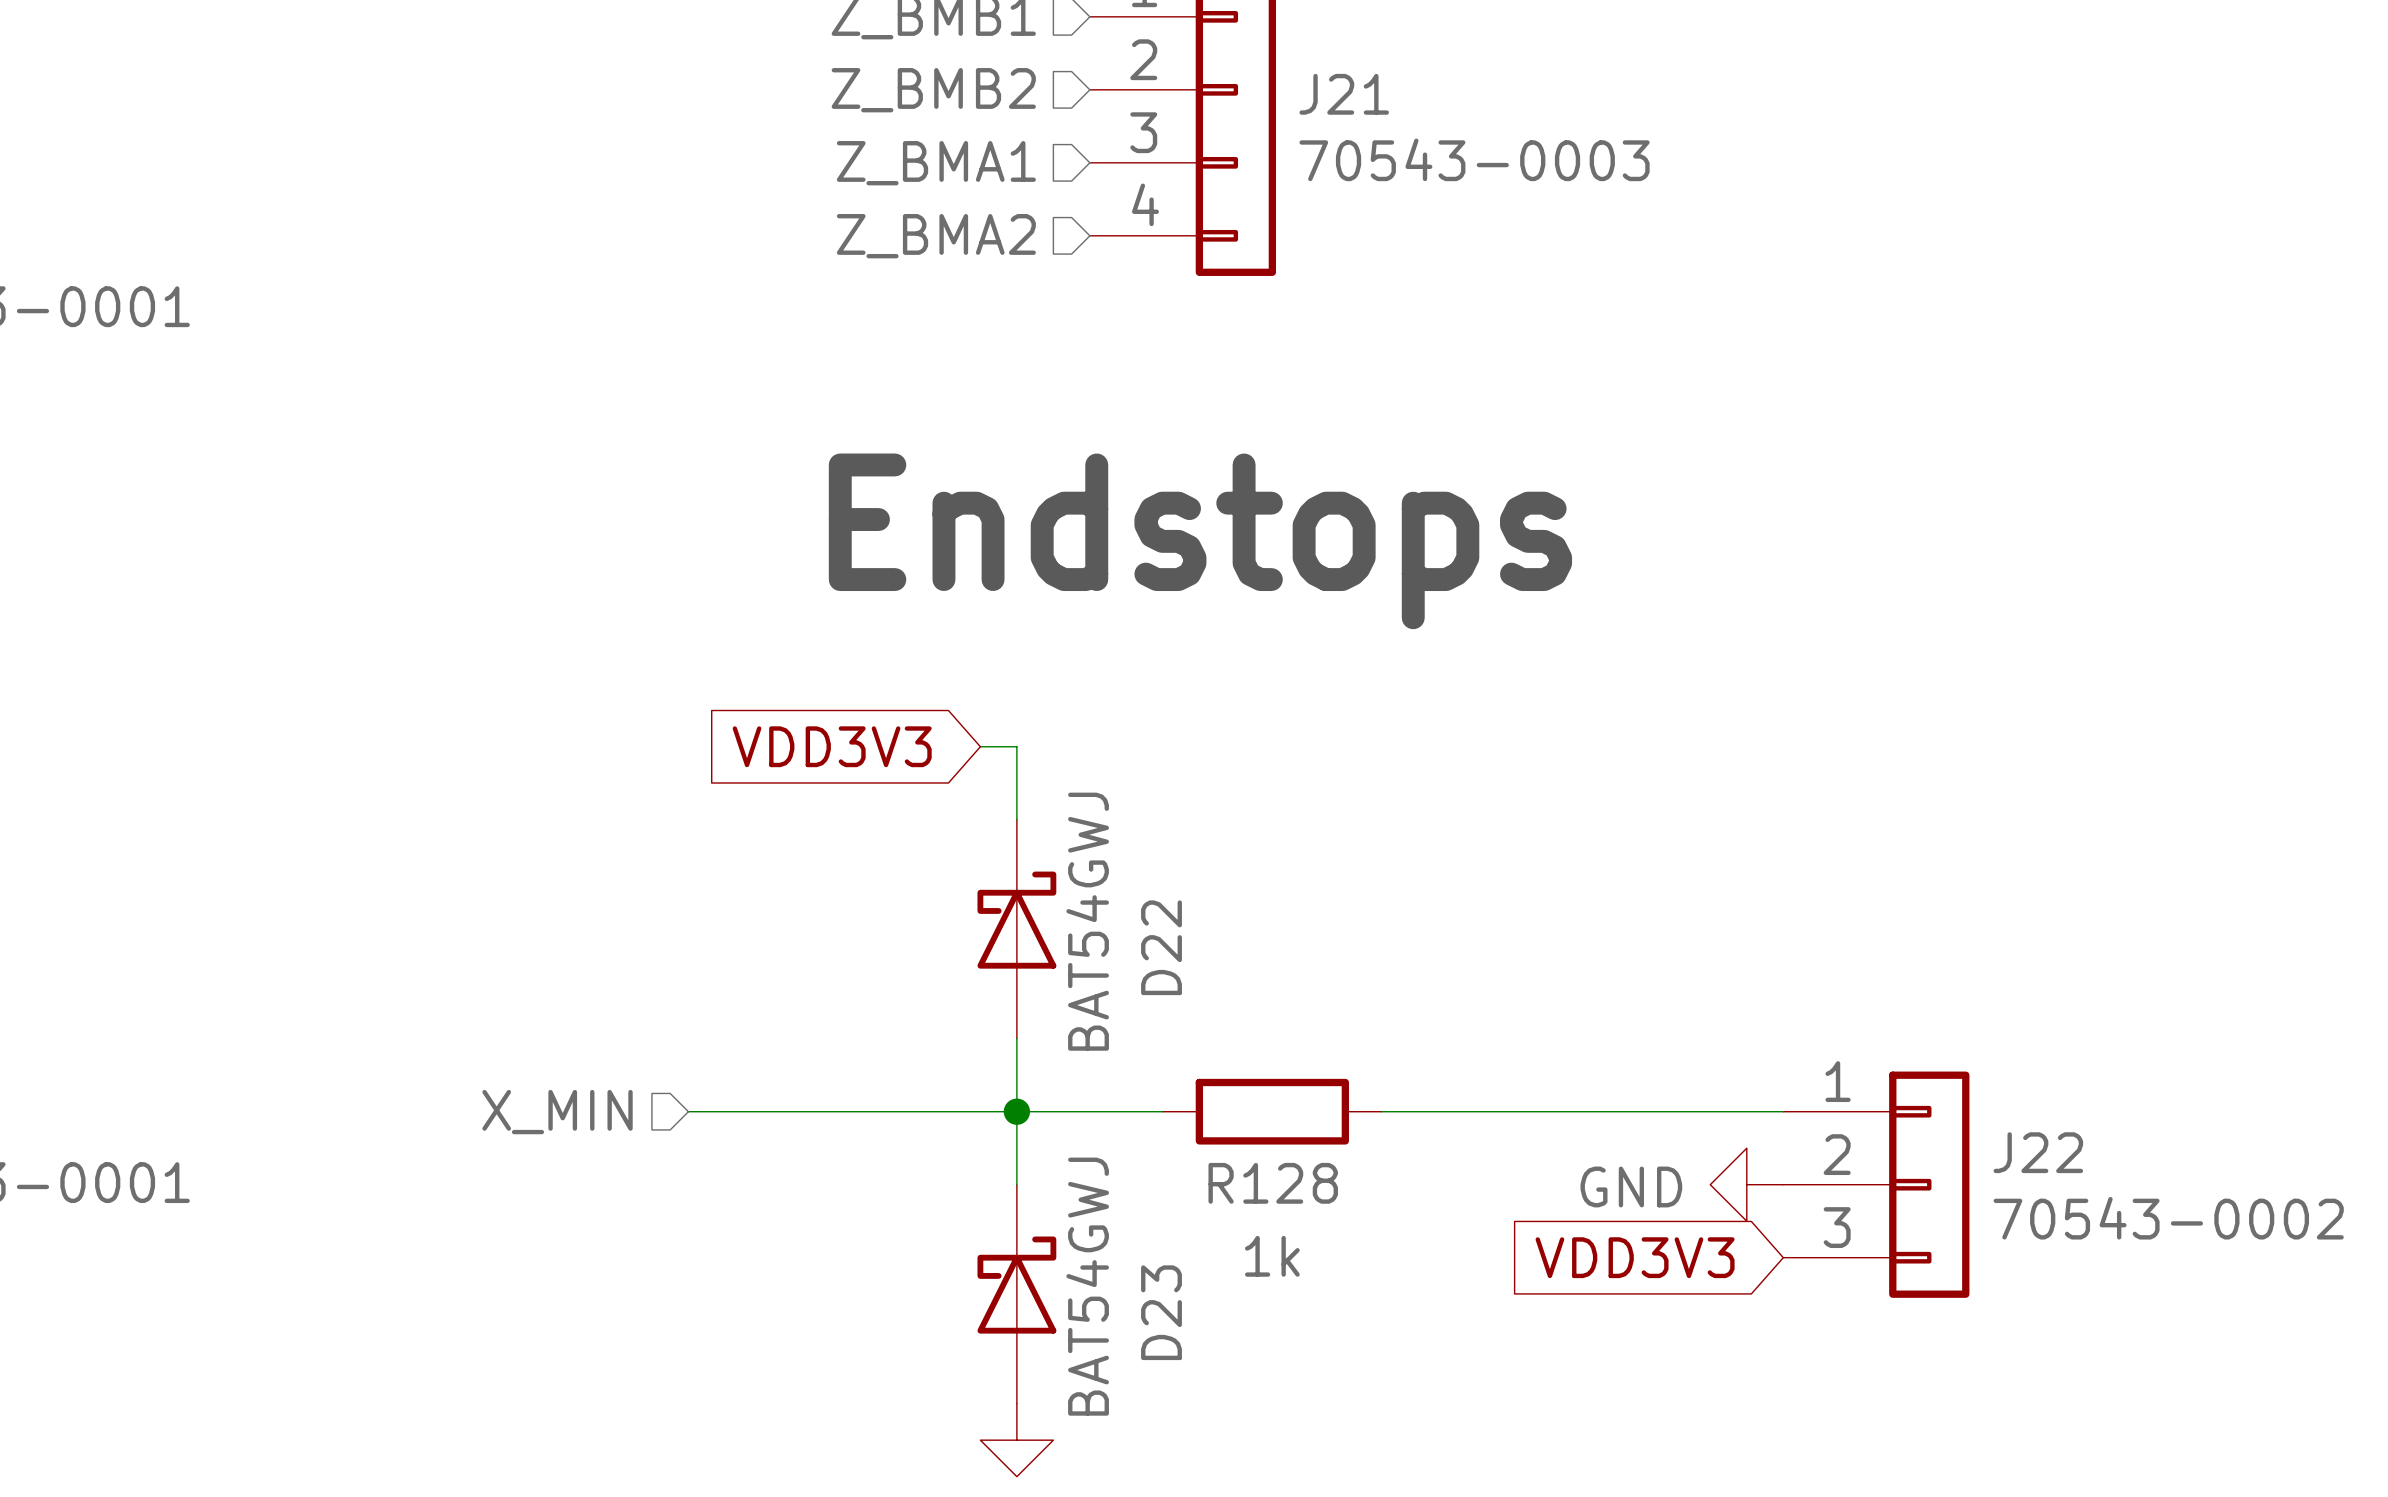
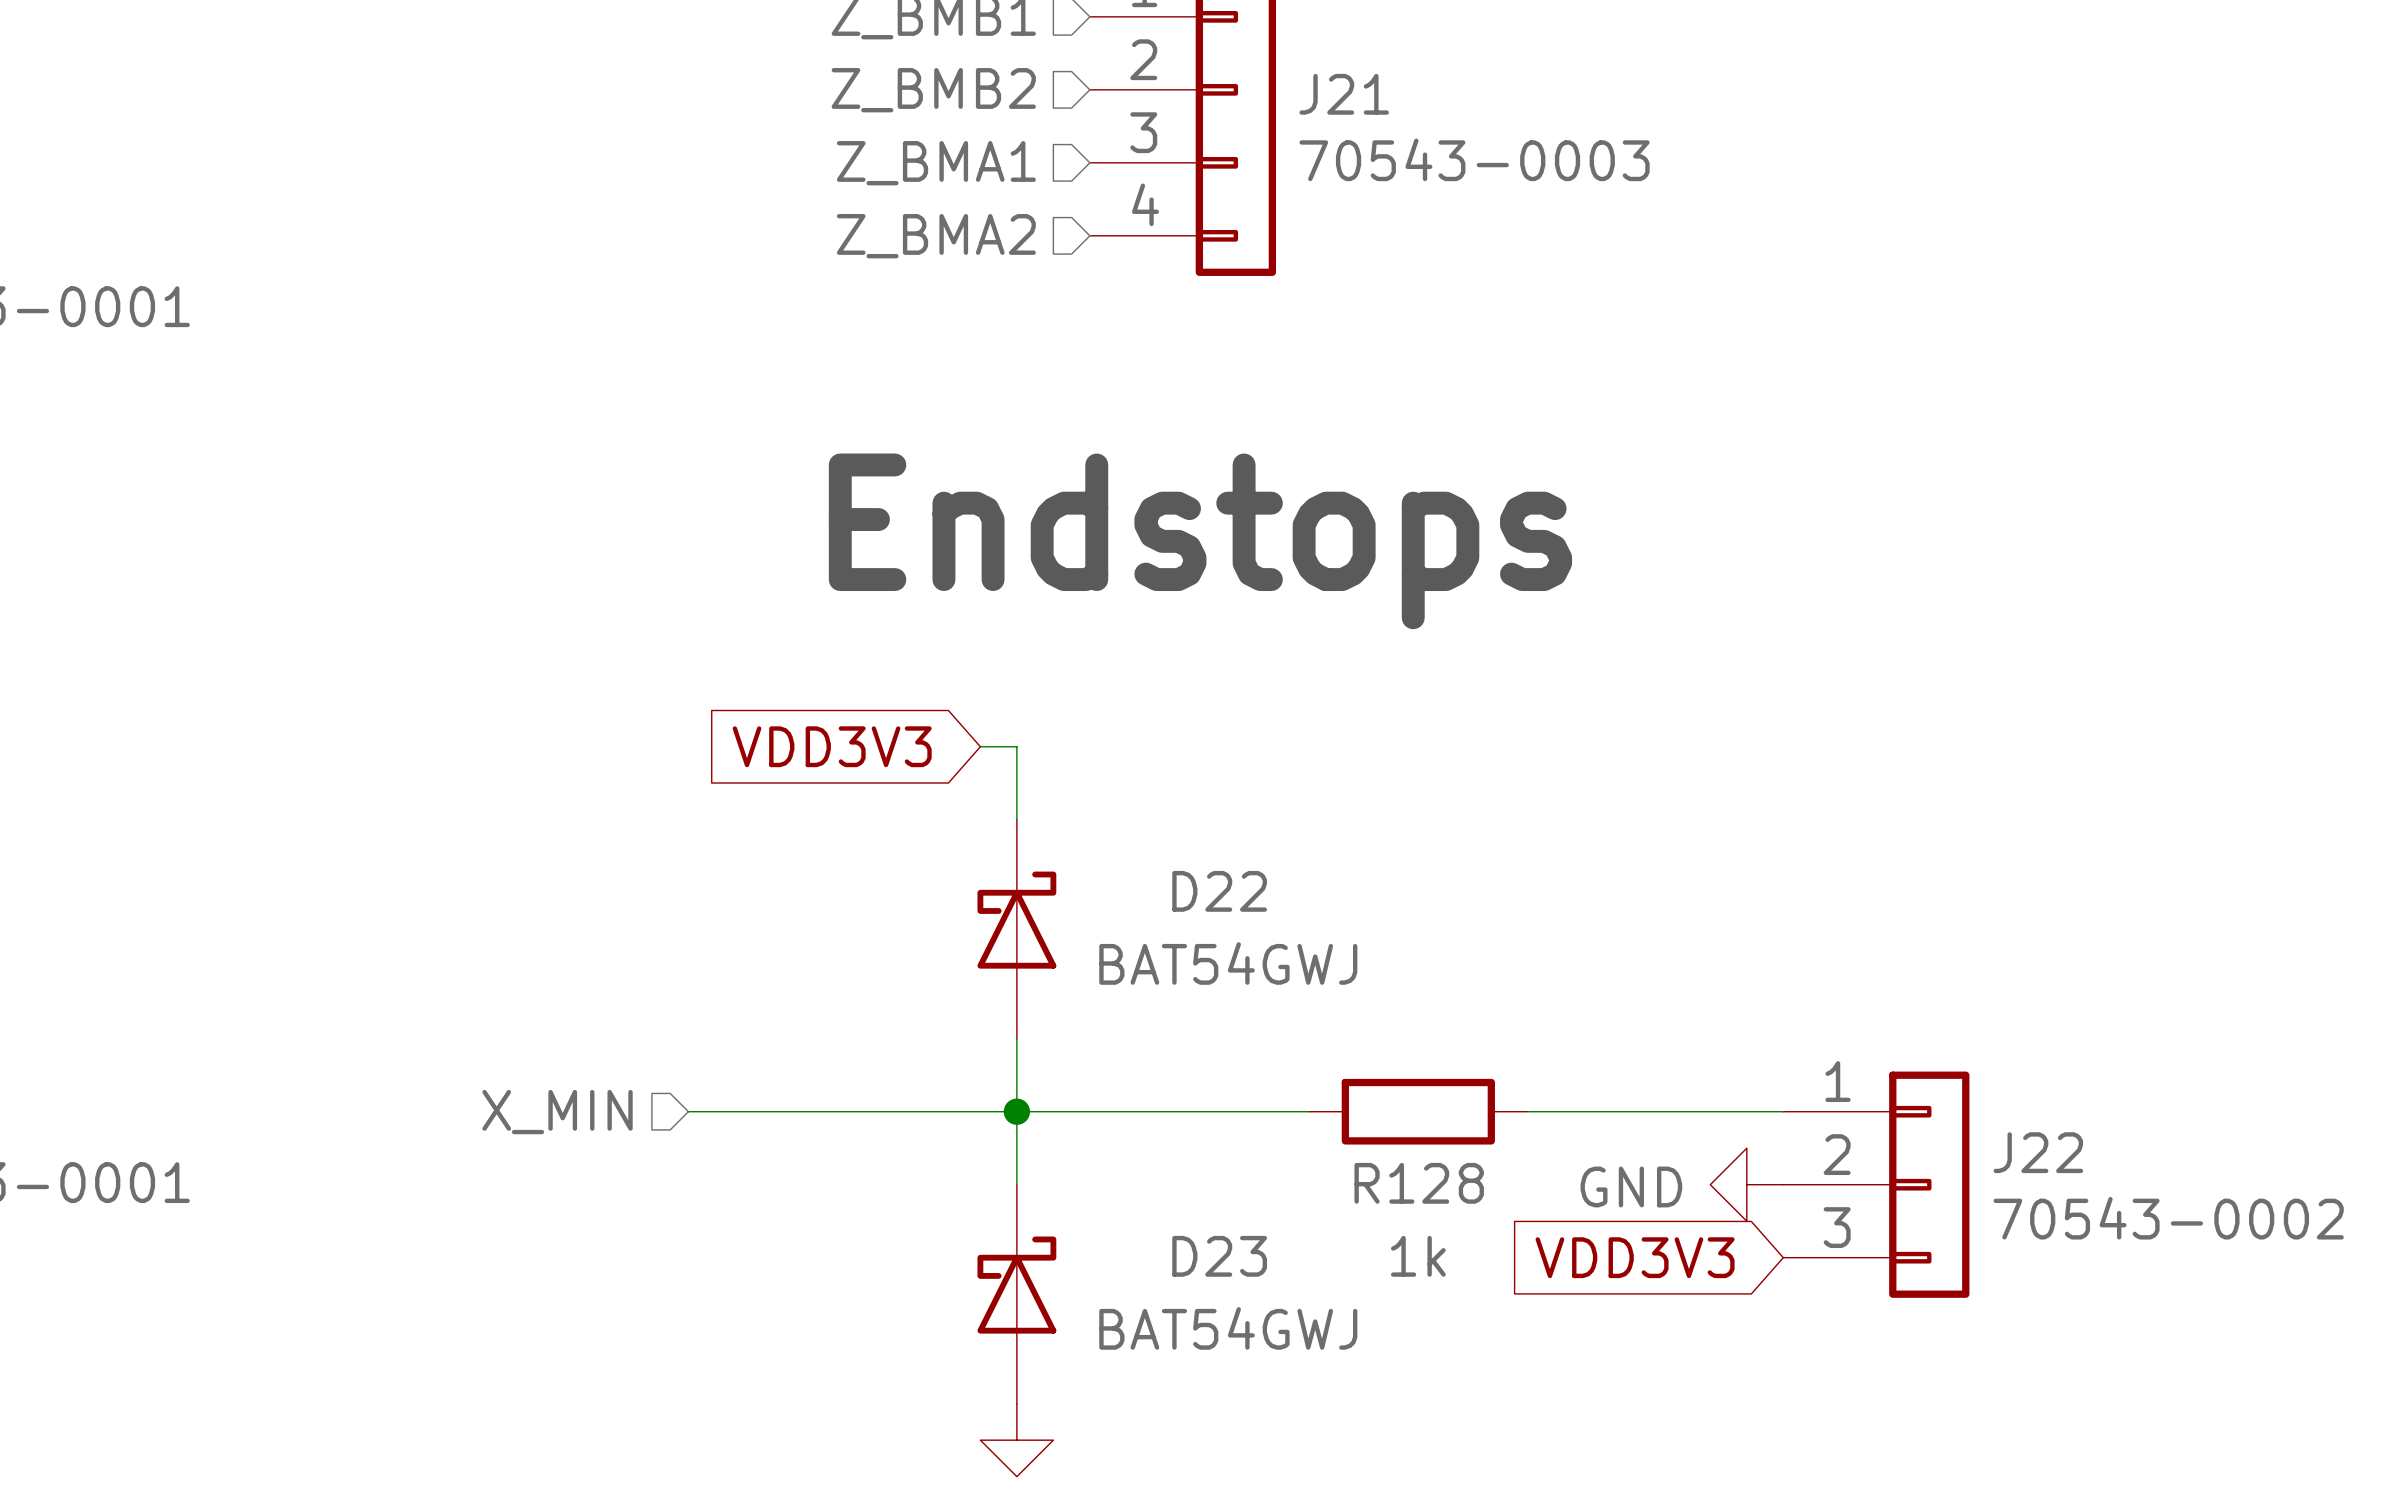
D22 value rotation: 0° (1087, 921) -> 90° clockwise (1228, 963)
D22 name rotation: 0° (1161, 947) -> 90° clockwise (1219, 891)
R128 position: (1272, 1111) -> (1418, 1111)
wire: (1381, 1111) (1527, 1111) -> (1162, 1111) (1308, 1111)
D23 value rotation: 0° (1087, 1286) -> 90° clockwise (1228, 1328)
D23 name rotation: 0° (1161, 1312) -> 90° clockwise (1219, 1256)

